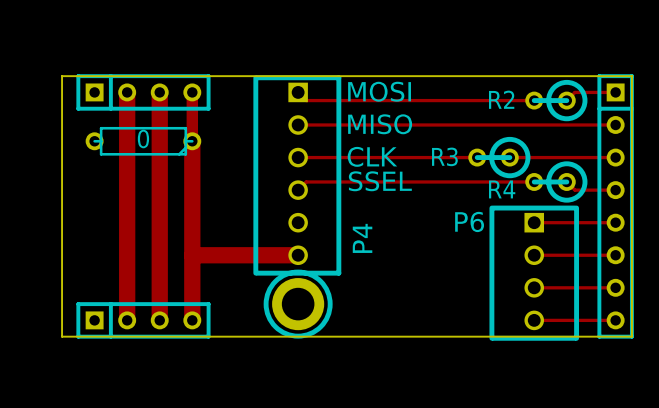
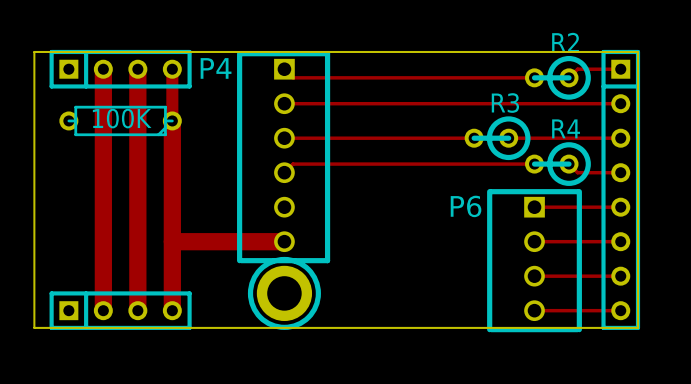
text: MOSI (379, 91) -> none
R2 name position: R2 (501, 99) -> R2 (565, 42)
text: MISO (380, 124) -> none
part value: 0 (143, 138) -> 100K (122, 118)
text: CLK (372, 156) -> none
R3 name position: R3 (444, 156) -> R3 (505, 103)
text: SSEL (380, 181) -> none
R4 name position: R4 (502, 189) -> R4 (566, 128)
P4 name rotation: 0° (362, 238) -> 90° clockwise (216, 68)
P4 name position: P4 (362, 238) -> P4 (216, 68)

